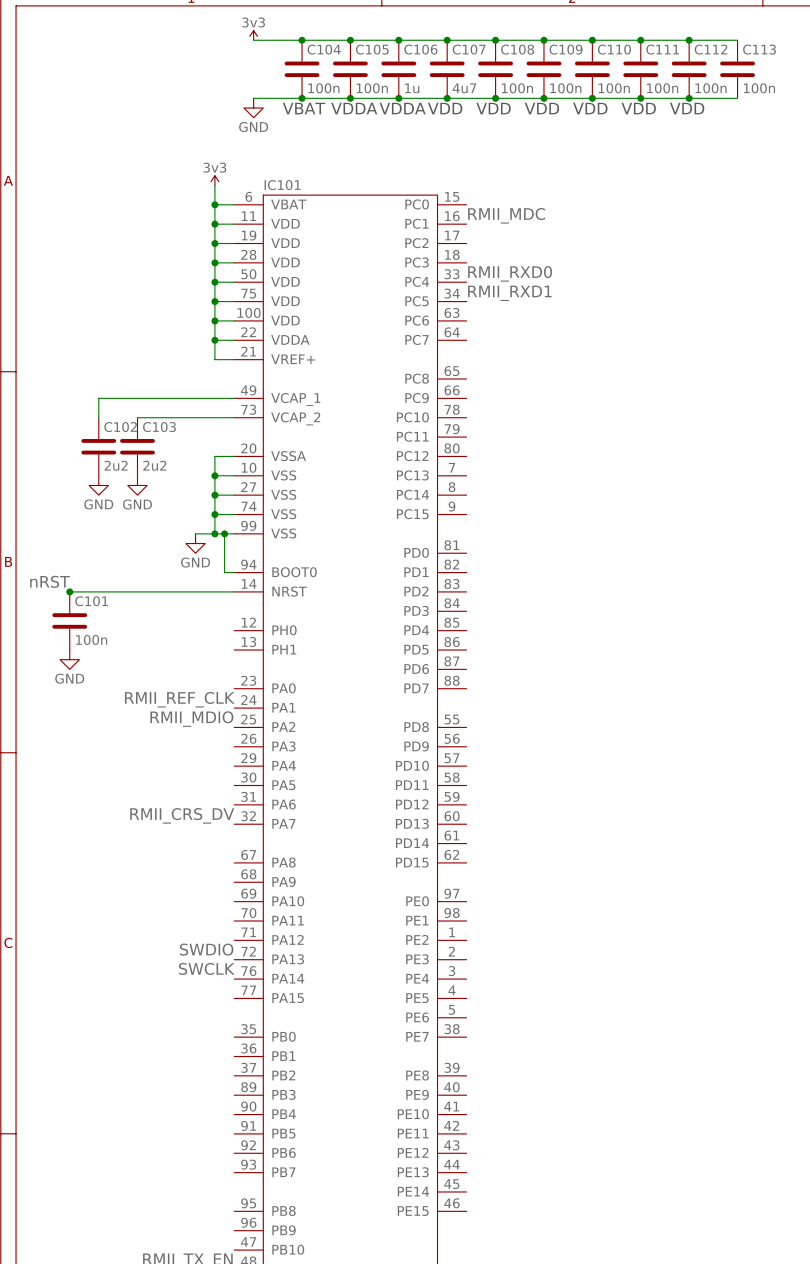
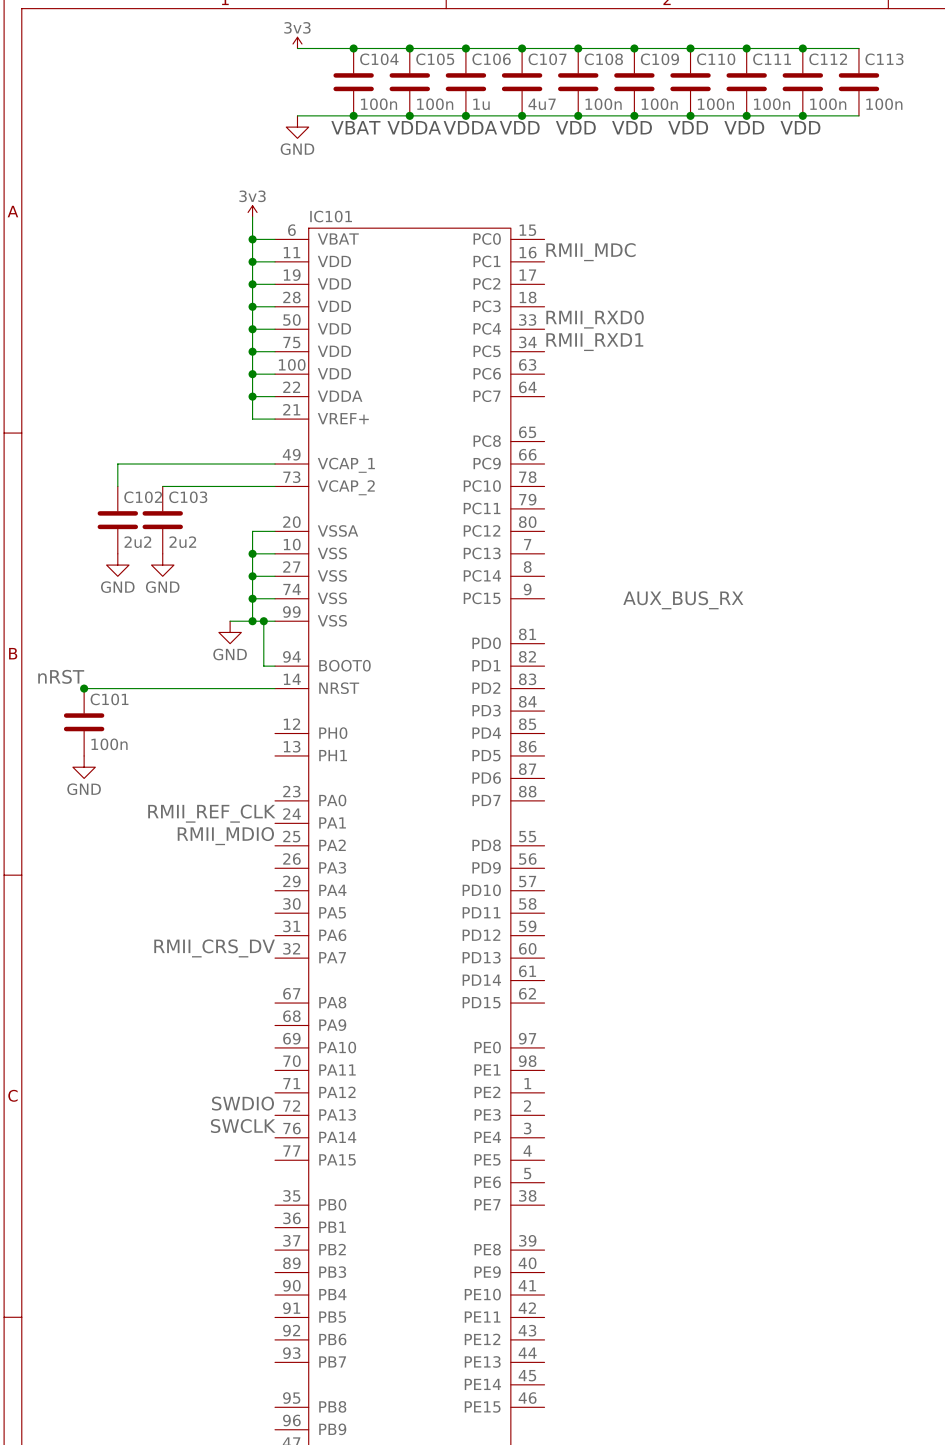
label: none -> AUX_BUS_RX (683, 600)

